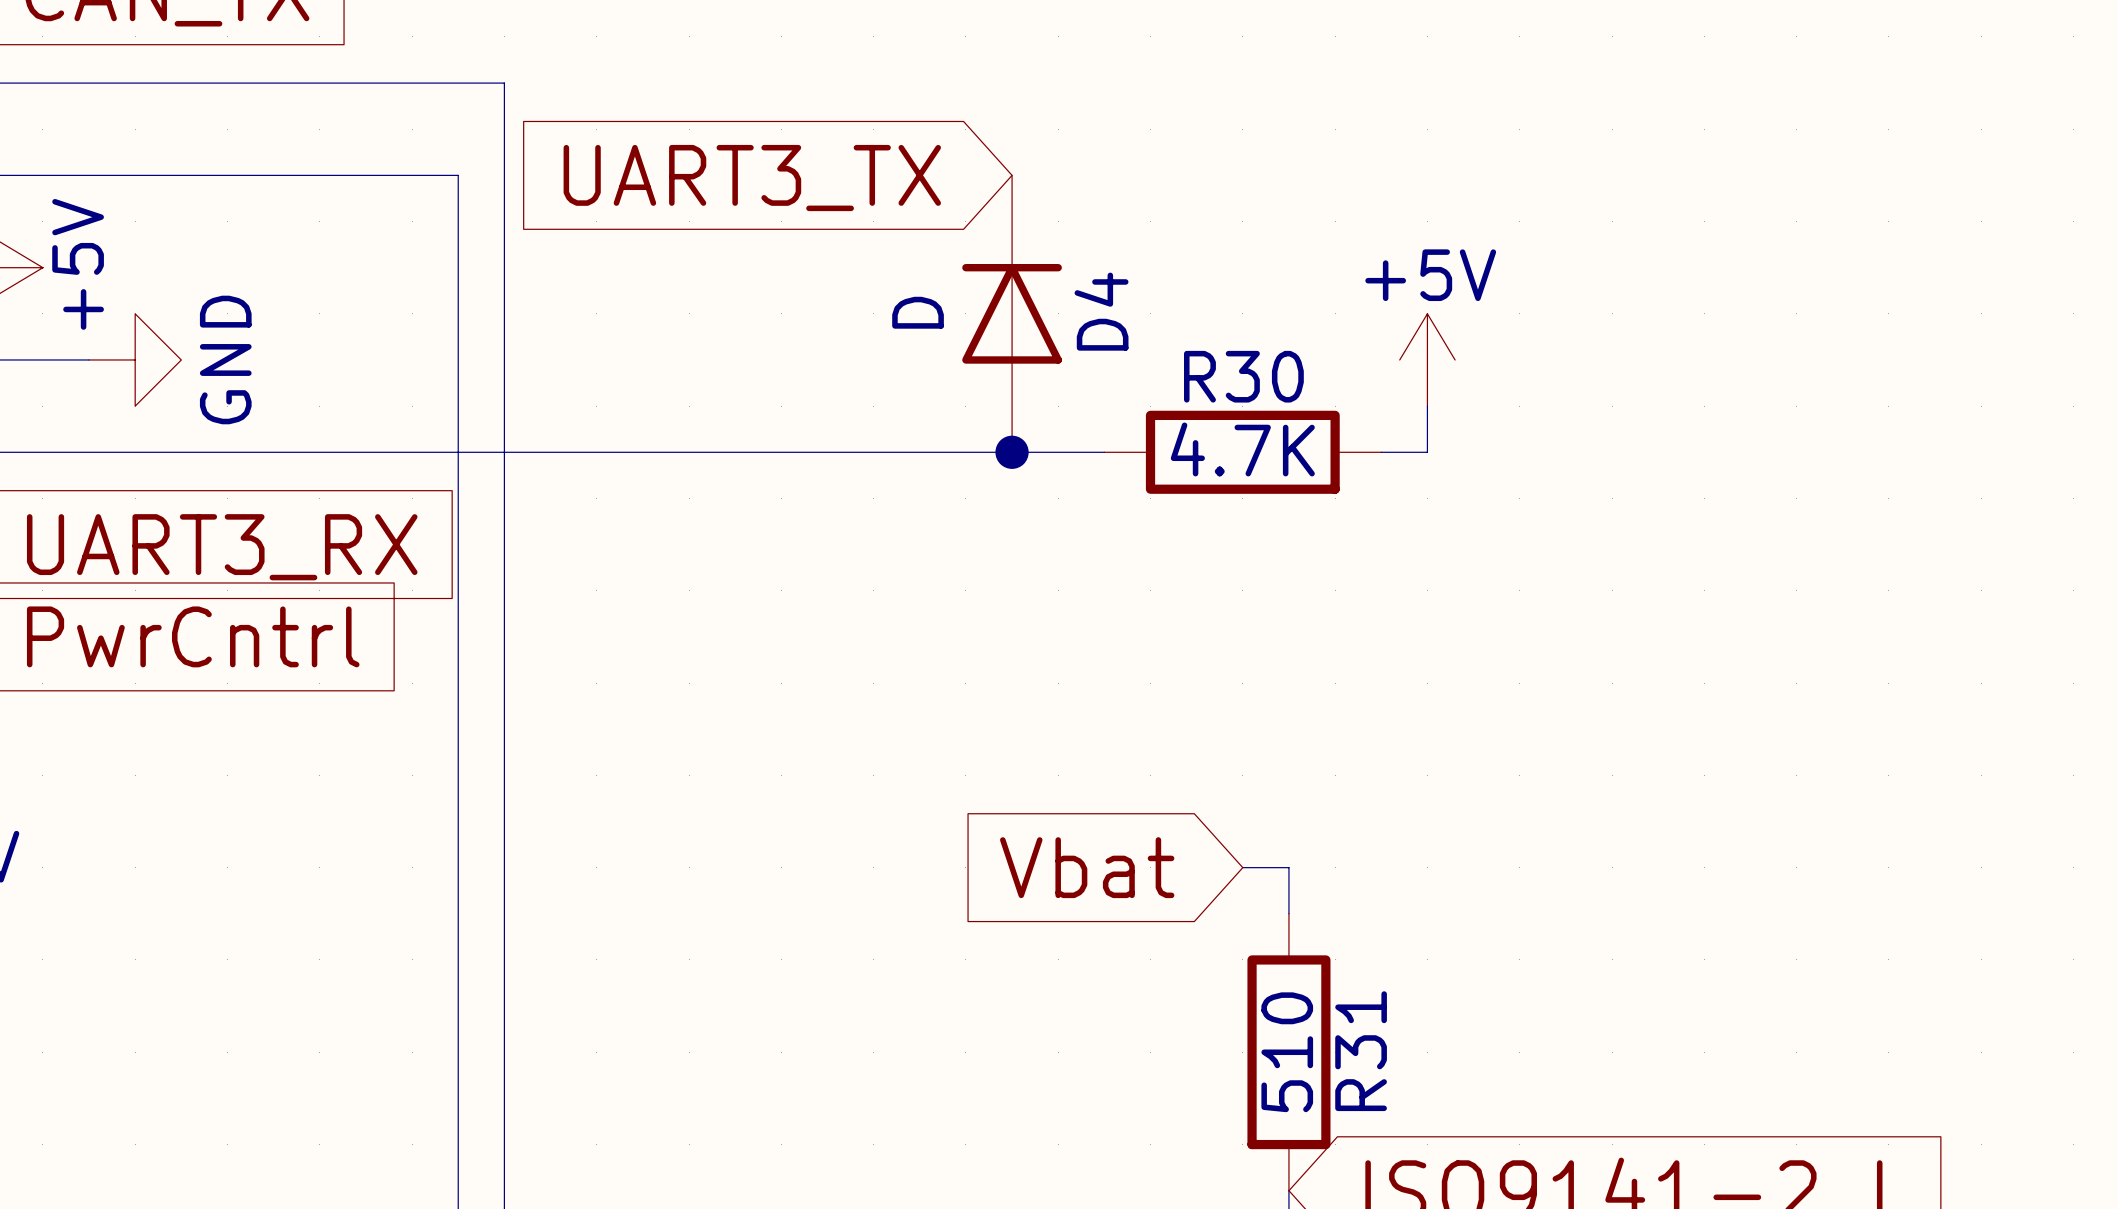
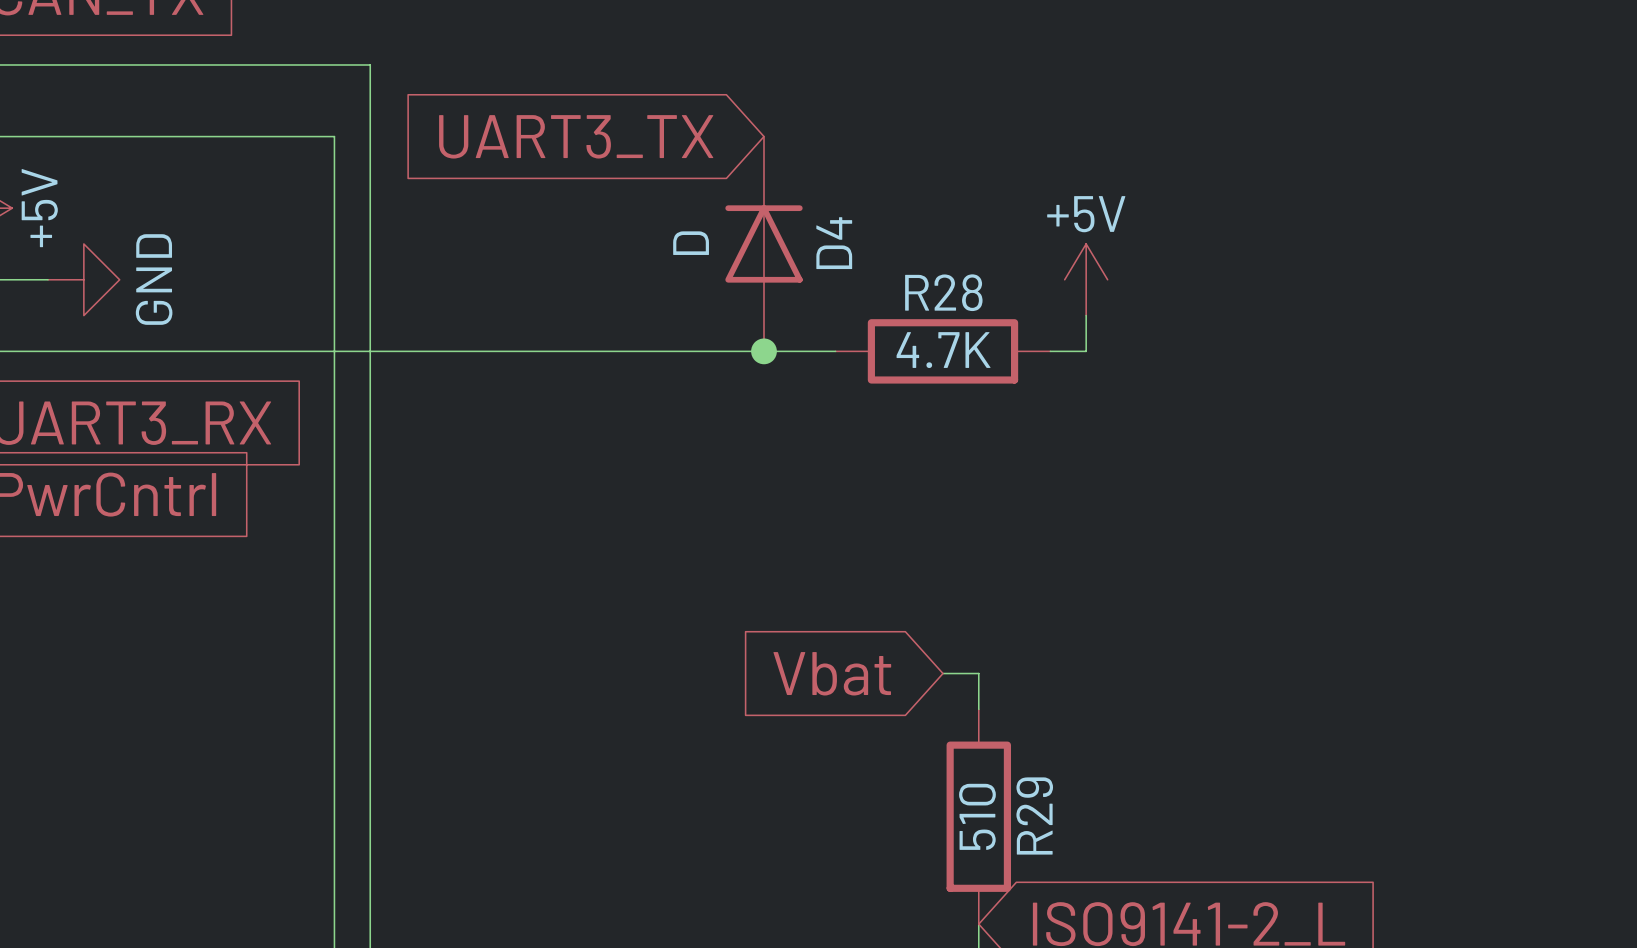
R30 name: R30 (1243, 376) -> R28 (943, 292)
R31 name: R31 (1361, 1051) -> R29 (1034, 815)

